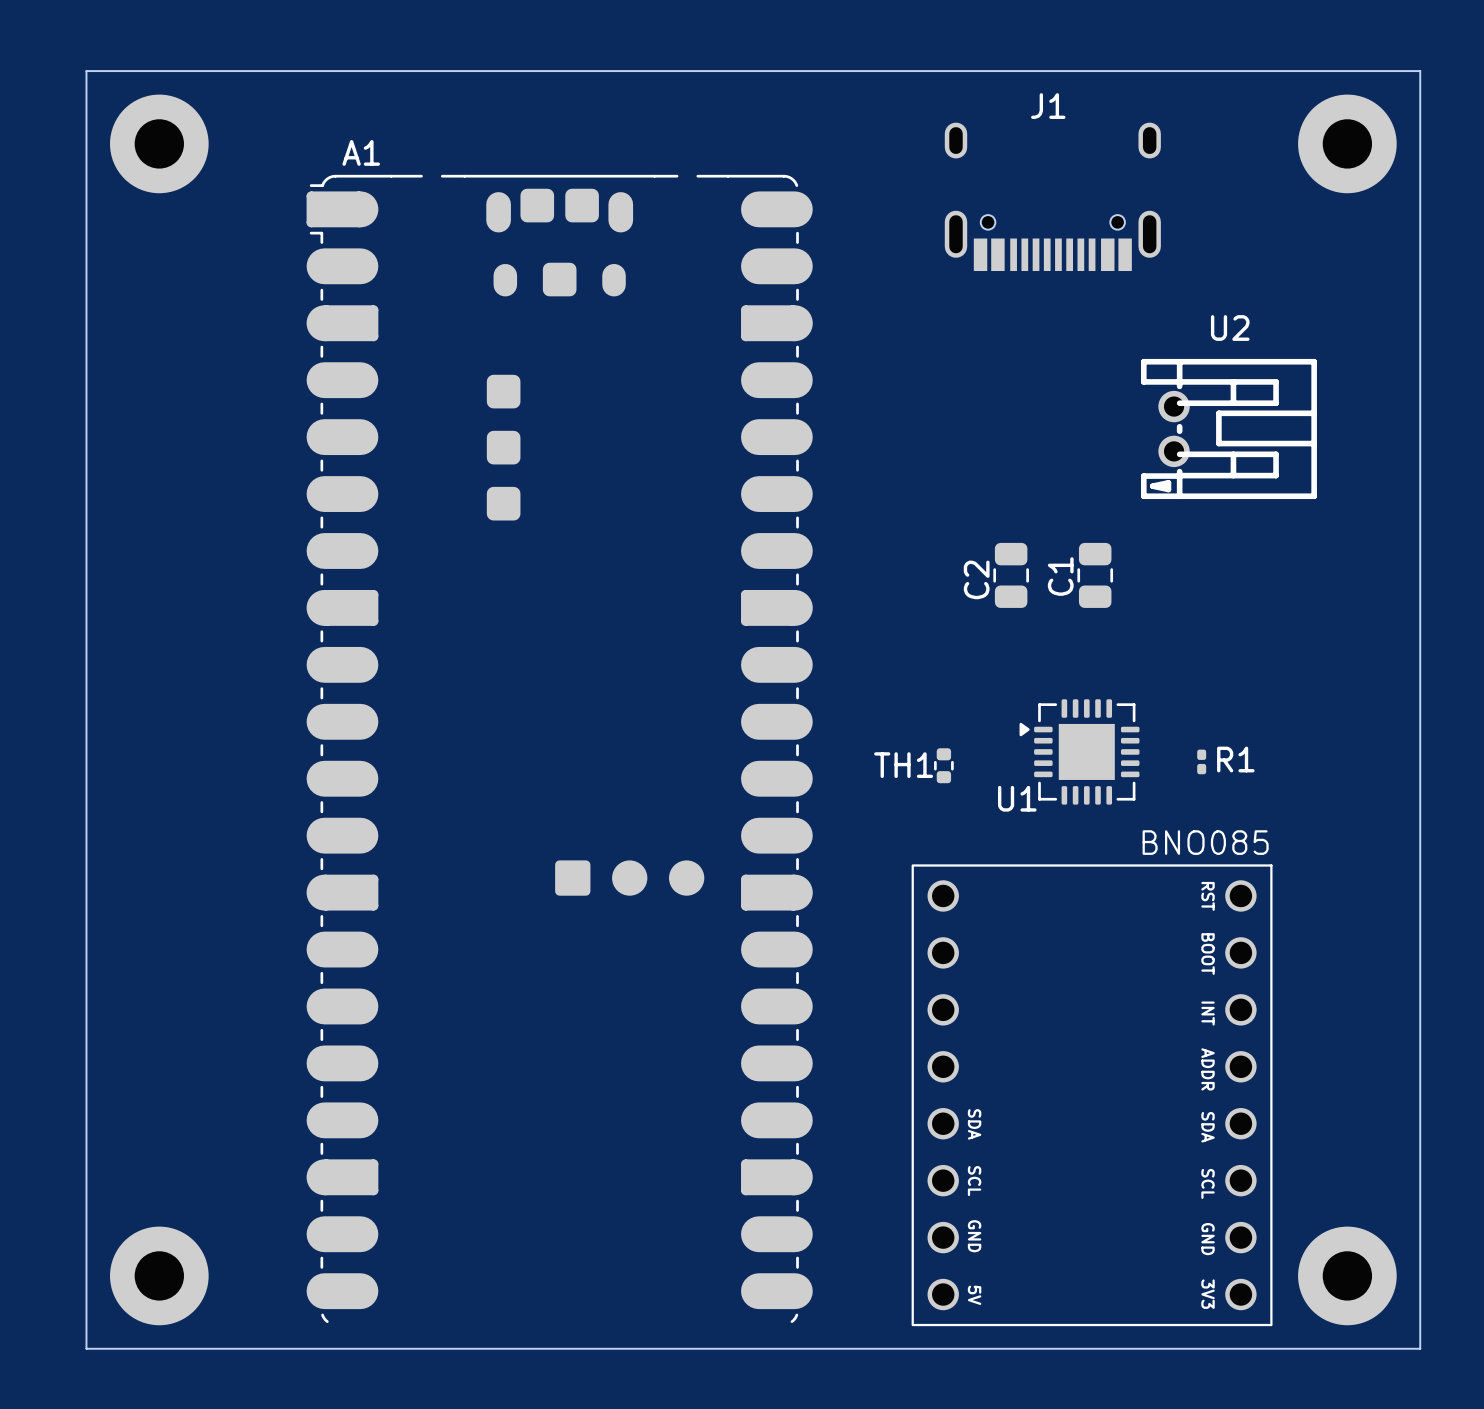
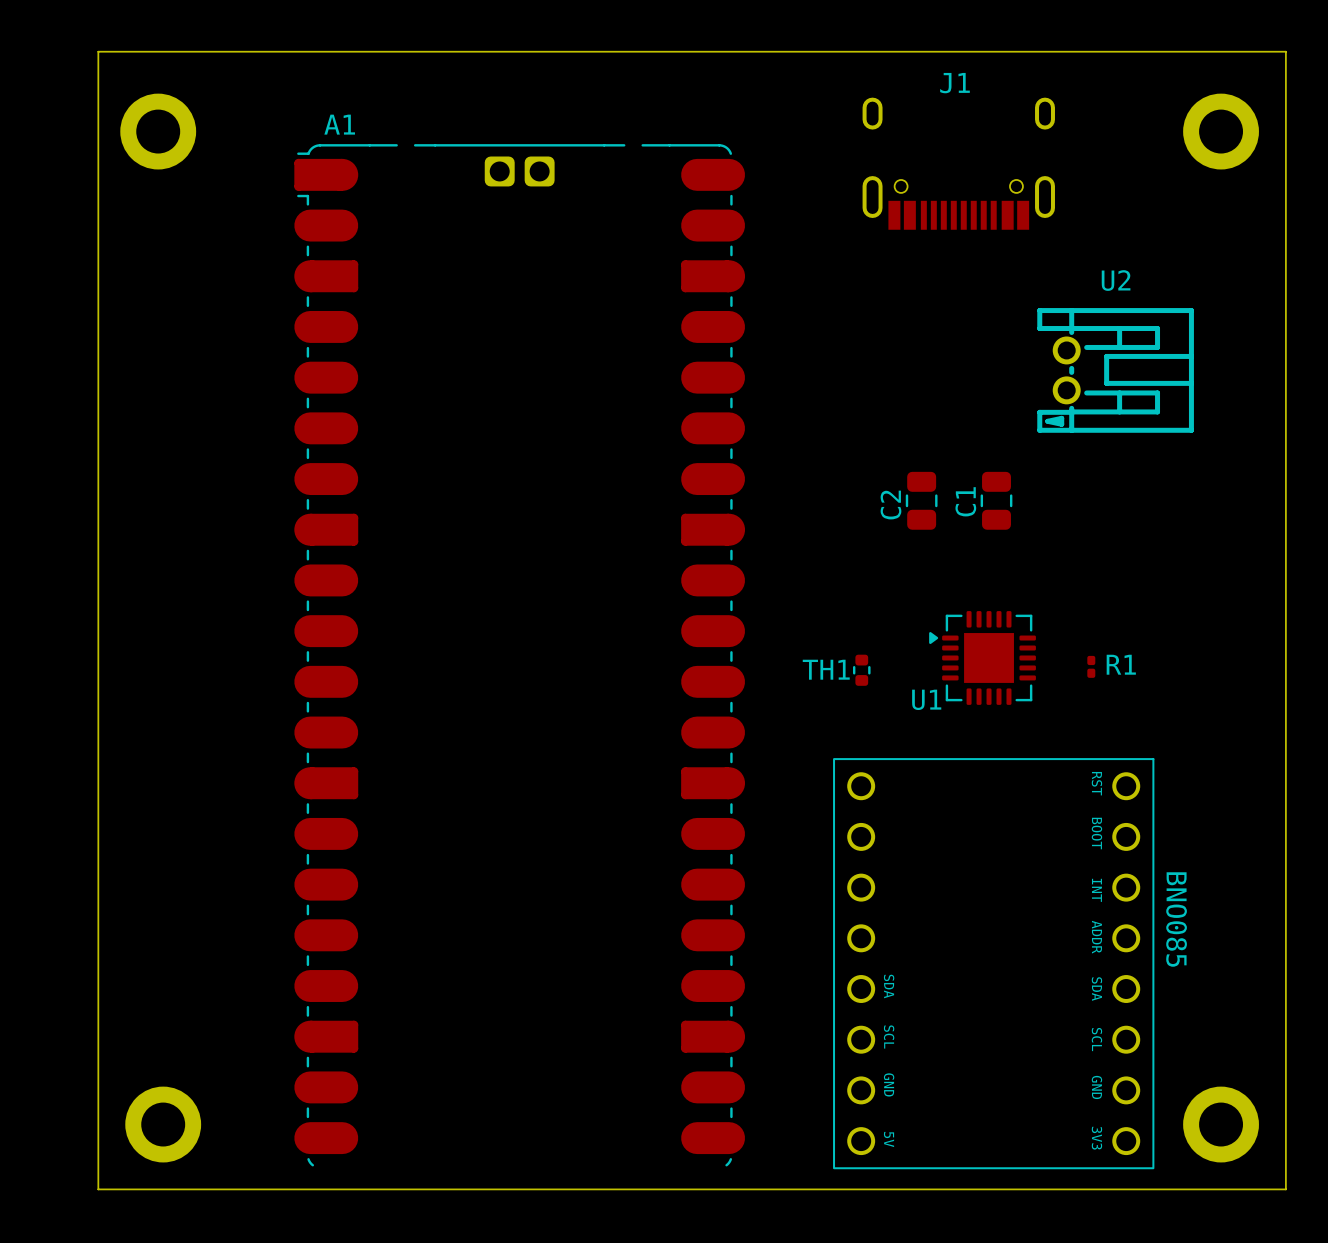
part footprint: [110, 94, 209, 194] -> [120, 93, 197, 170]
part footprint: [1298, 94, 1397, 194] -> [1183, 93, 1259, 170]
A1 footprint: [306, 174, 813, 1324] -> [294, 144, 746, 1167]
U2 footprint: [1140, 358, 1317, 500] -> [1037, 308, 1194, 433]
part text rotation: 0° (1205, 842) -> 90° clockwise (1176, 919)
part text position: BNO085 (1205, 842) -> BNO085 (1176, 919)
part footprint: [110, 1226, 209, 1326] -> [125, 1086, 202, 1163]
part footprint: [1298, 1226, 1397, 1326] -> [1183, 1086, 1259, 1163]

